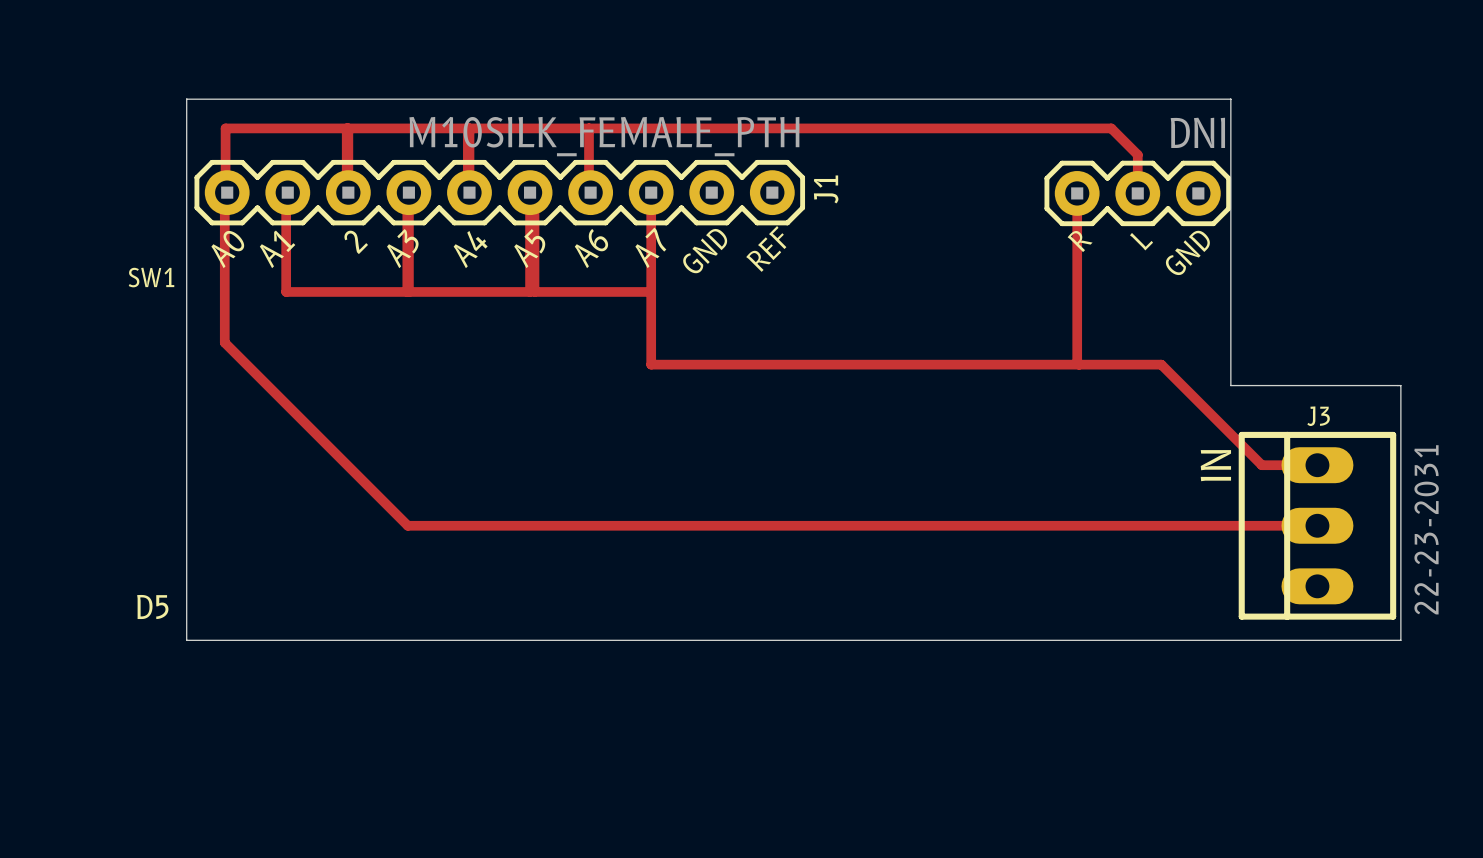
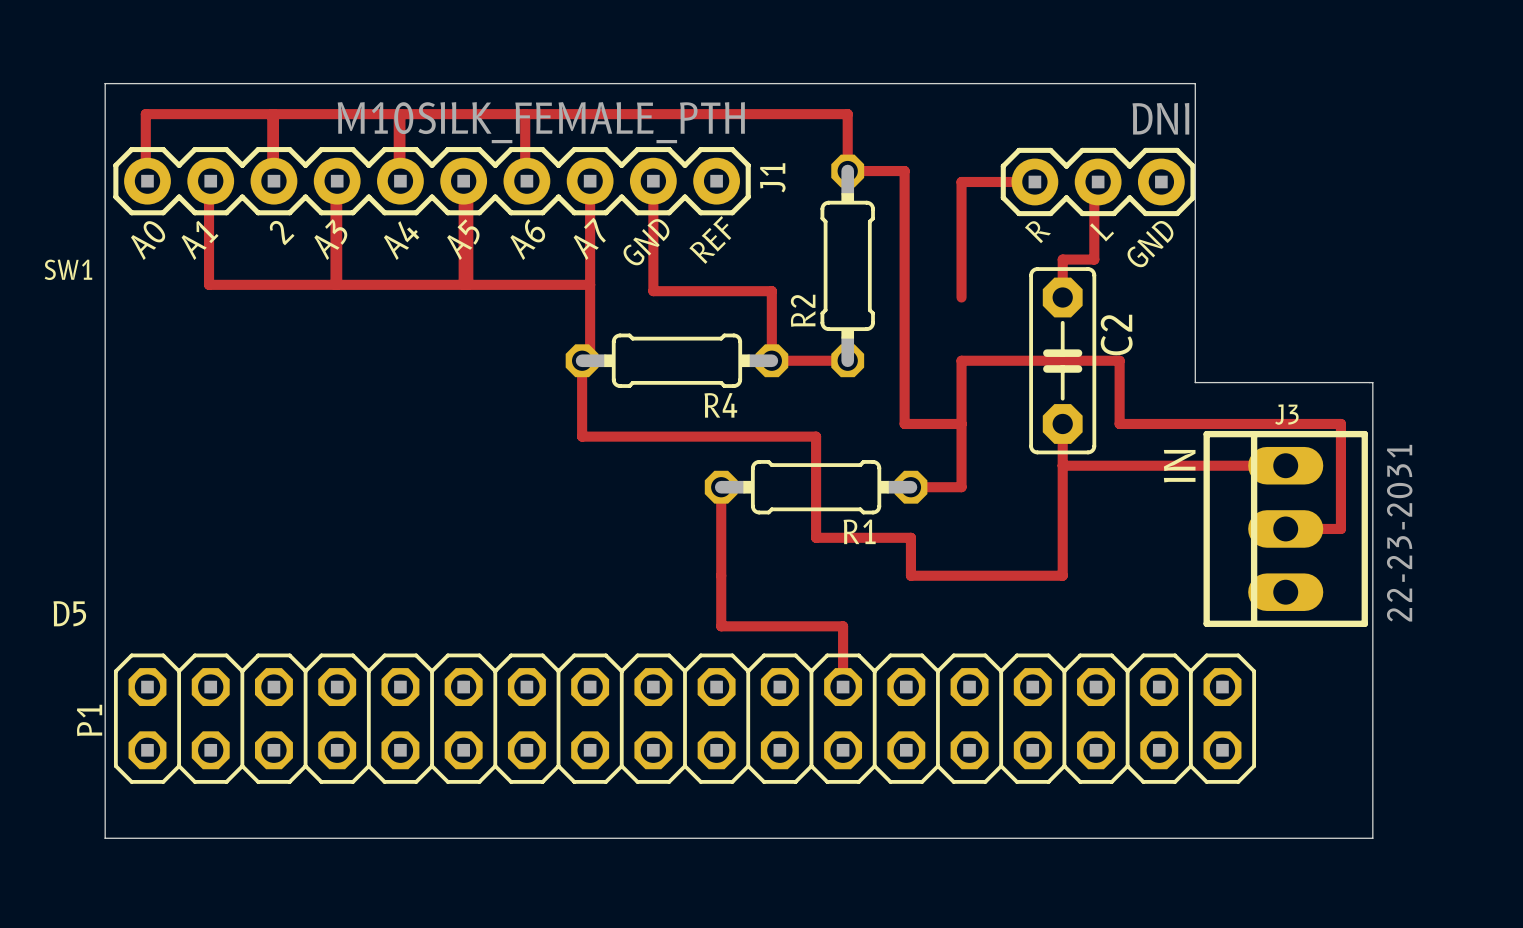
track: (897, 128) (1111, 128) (1137, 154) (1137, 193) -> (847, 114) (847, 171) (904, 171) (904, 423) (961, 423)
track: (227, 192) (224, 195) (224, 342) (407, 525) (1317, 525) -> none
track: (1077, 193) (1077, 362) (1079, 364) -> (1034, 181) (961, 181) (961, 297)
track: none -> (1098, 181) (1094, 181) (1094, 259) (1062, 259) (1062, 297)
R2: none -> (847, 265)
track: (651, 364) (825, 364) -> (653, 181) (653, 291) (771, 291) (771, 360)
track: none -> (590, 360) (582, 360) (582, 436) (816, 436) (816, 537) (910, 537) (910, 575) (1062, 575) (1062, 423)
R4: none -> (676, 360)
track: (897, 364) (1006, 364) -> (910, 487) (961, 487) (961, 360)
C2: none -> (1062, 360)
track: (1158, 364) (1161, 364) (1261, 465) -> (1119, 360) (1119, 423) (1340, 423) (1340, 528) (1285, 528)
track: none -> (1062, 465) (1227, 465)
track: none -> (721, 487) (721, 626) (843, 626) (843, 687)
R1: none -> (816, 487)
board edge: (186, 640) (1400, 640) -> (105, 838) (1372, 838) (1372, 648)
board edge: none -> (105, 648) (105, 838)
P1: none -> (684, 718)

